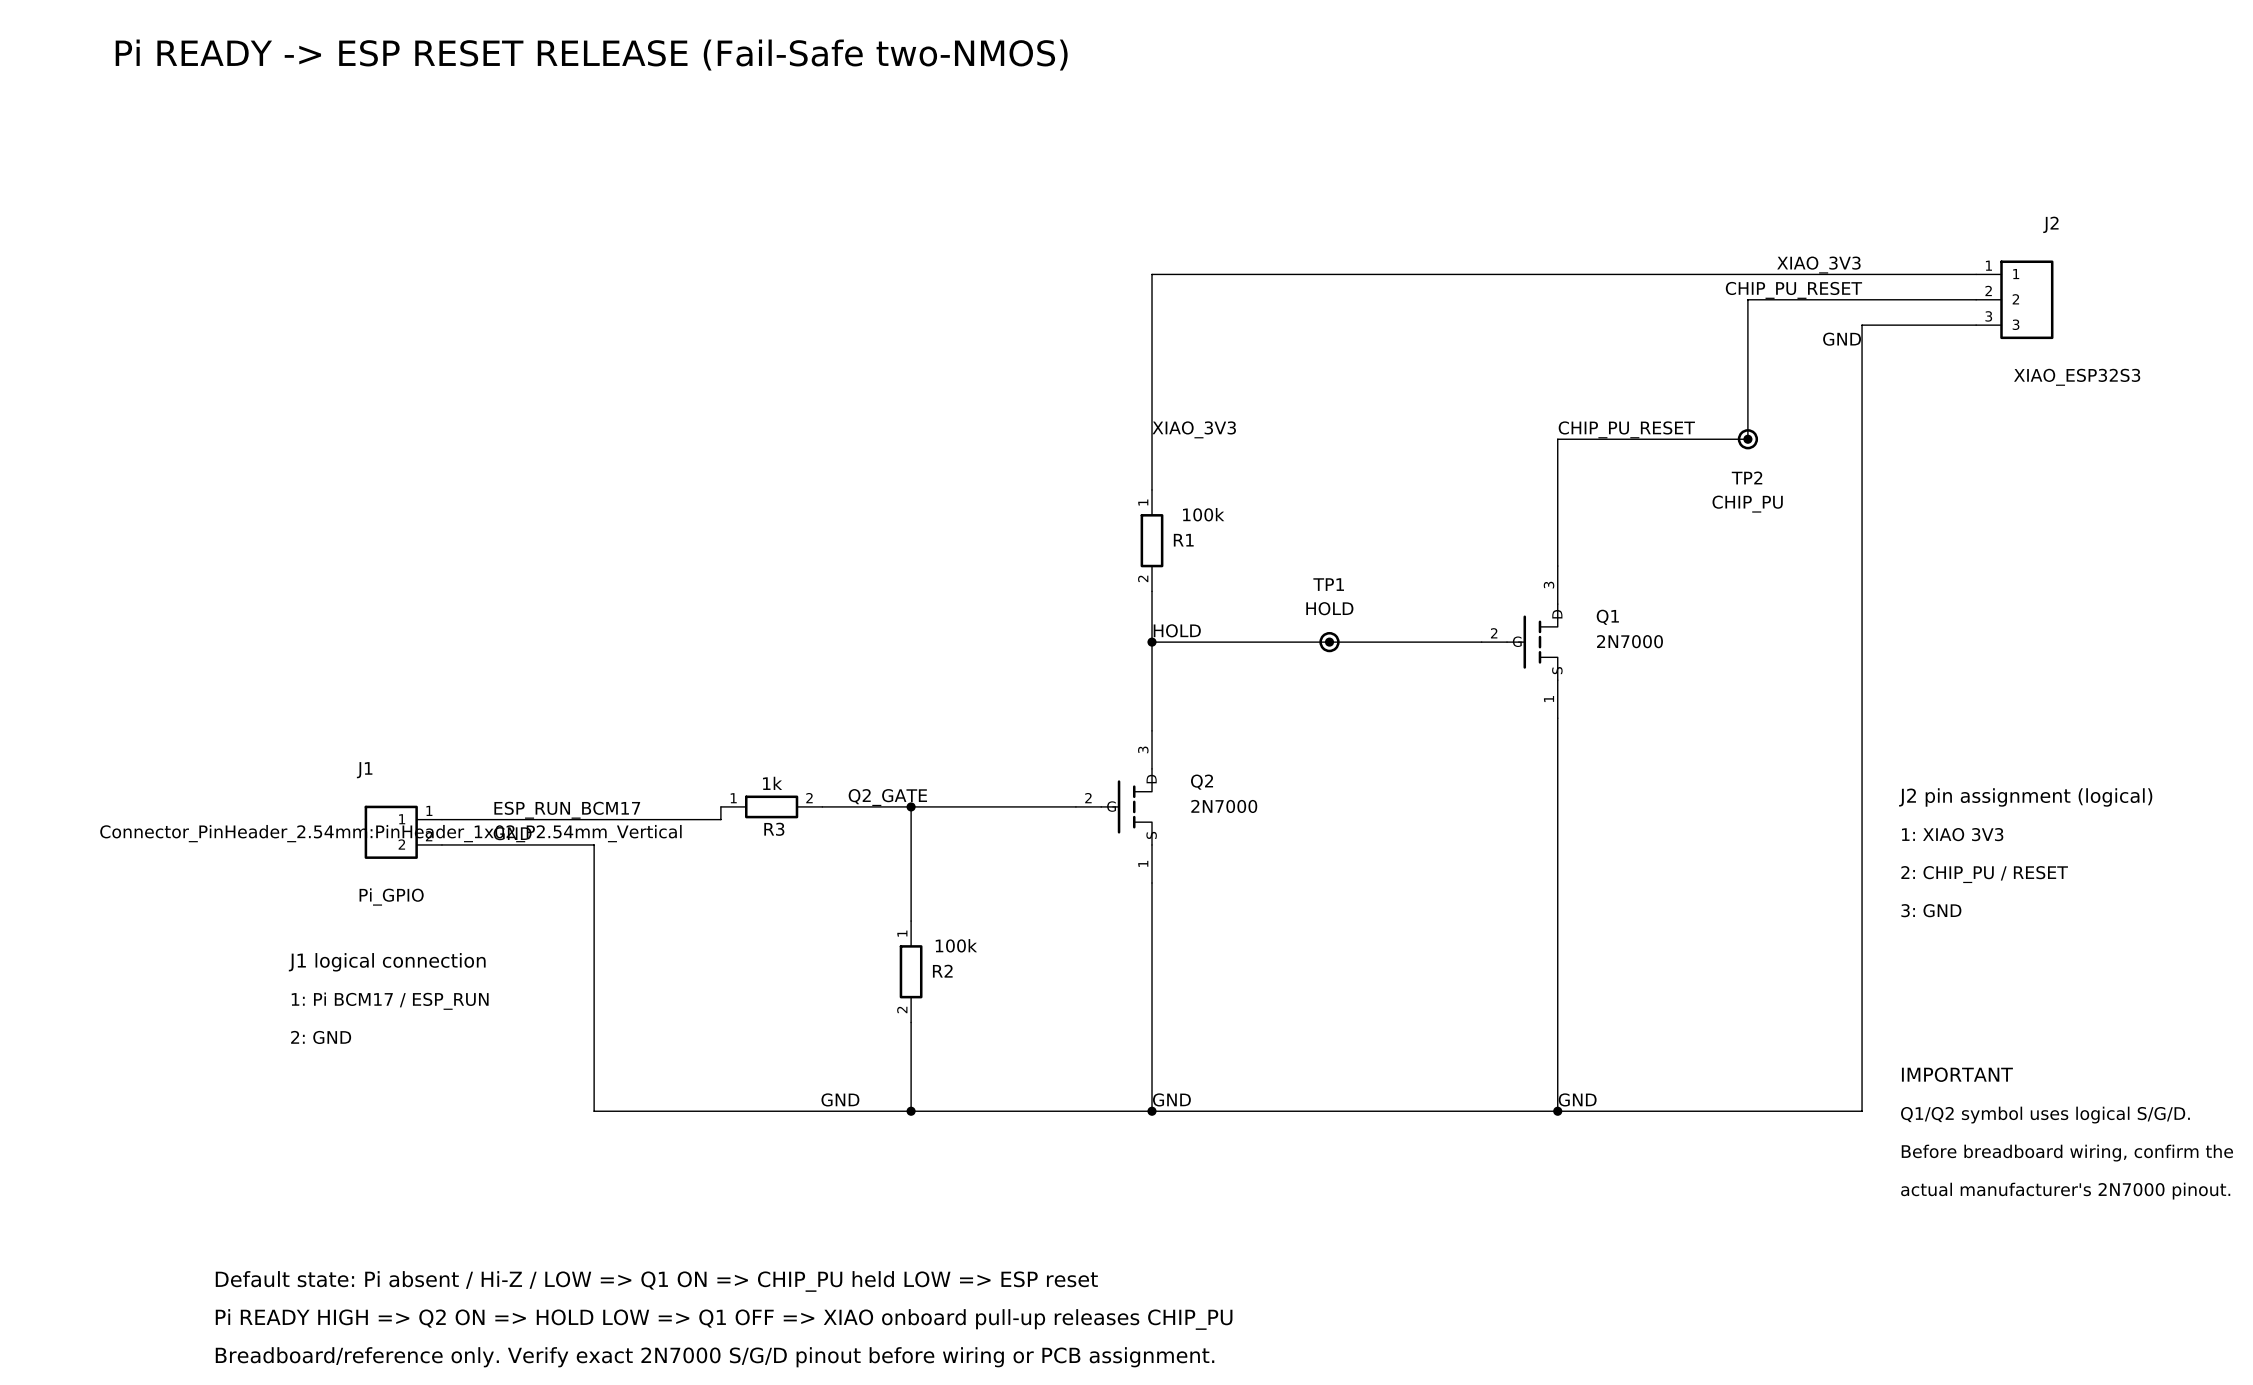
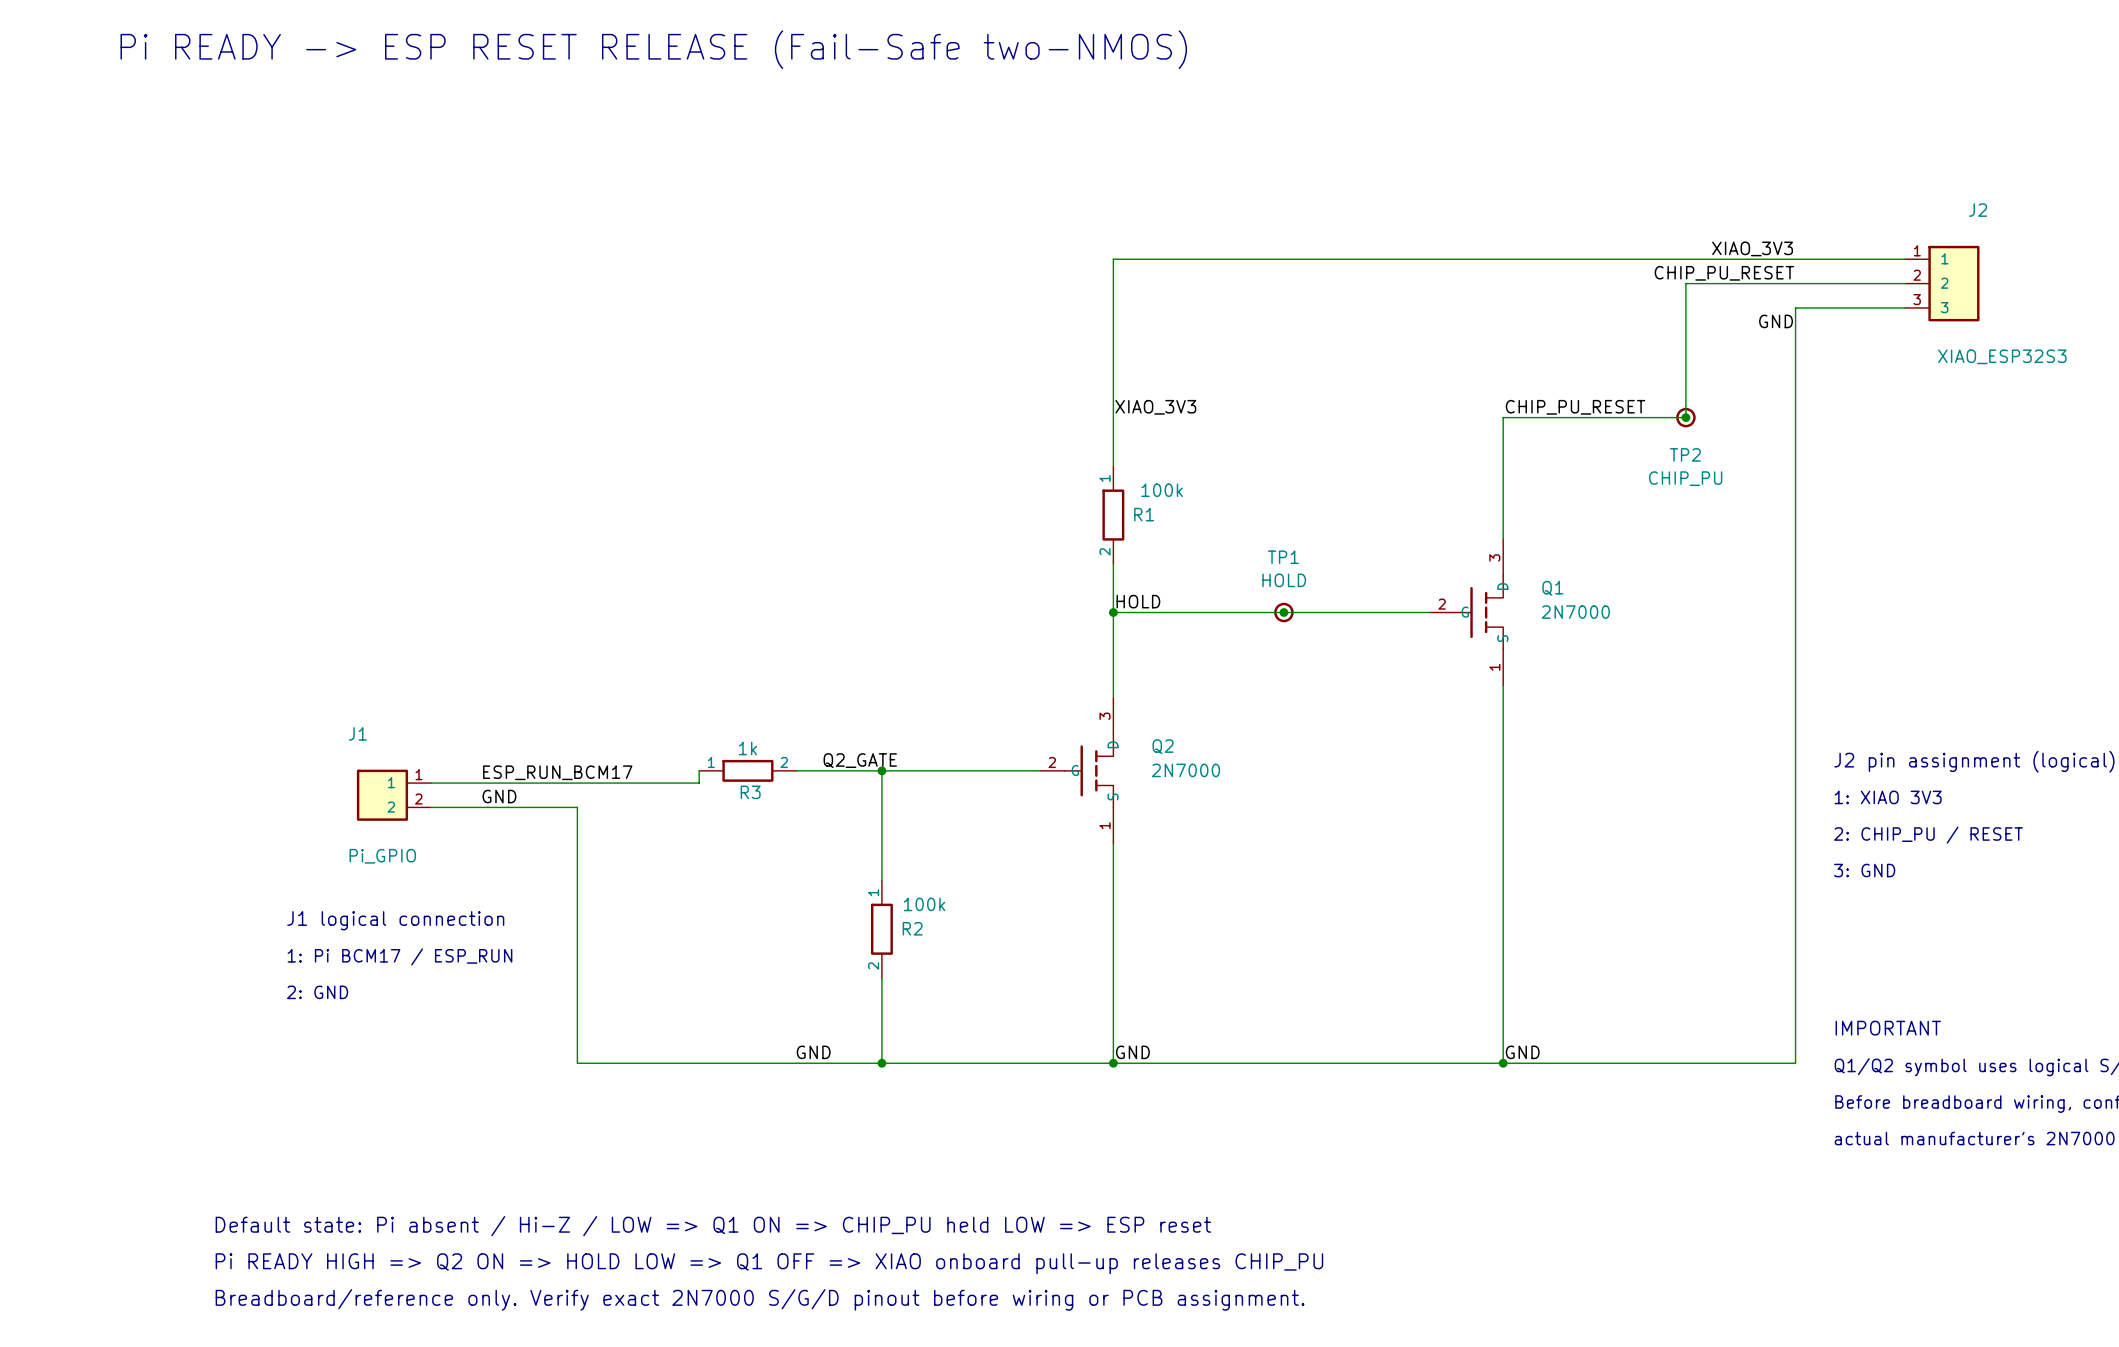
J1 text: Connector_PinHeader_2.54mm:PinHeader_1x02_P2.54mm_Vertical (390, 833) -> none

